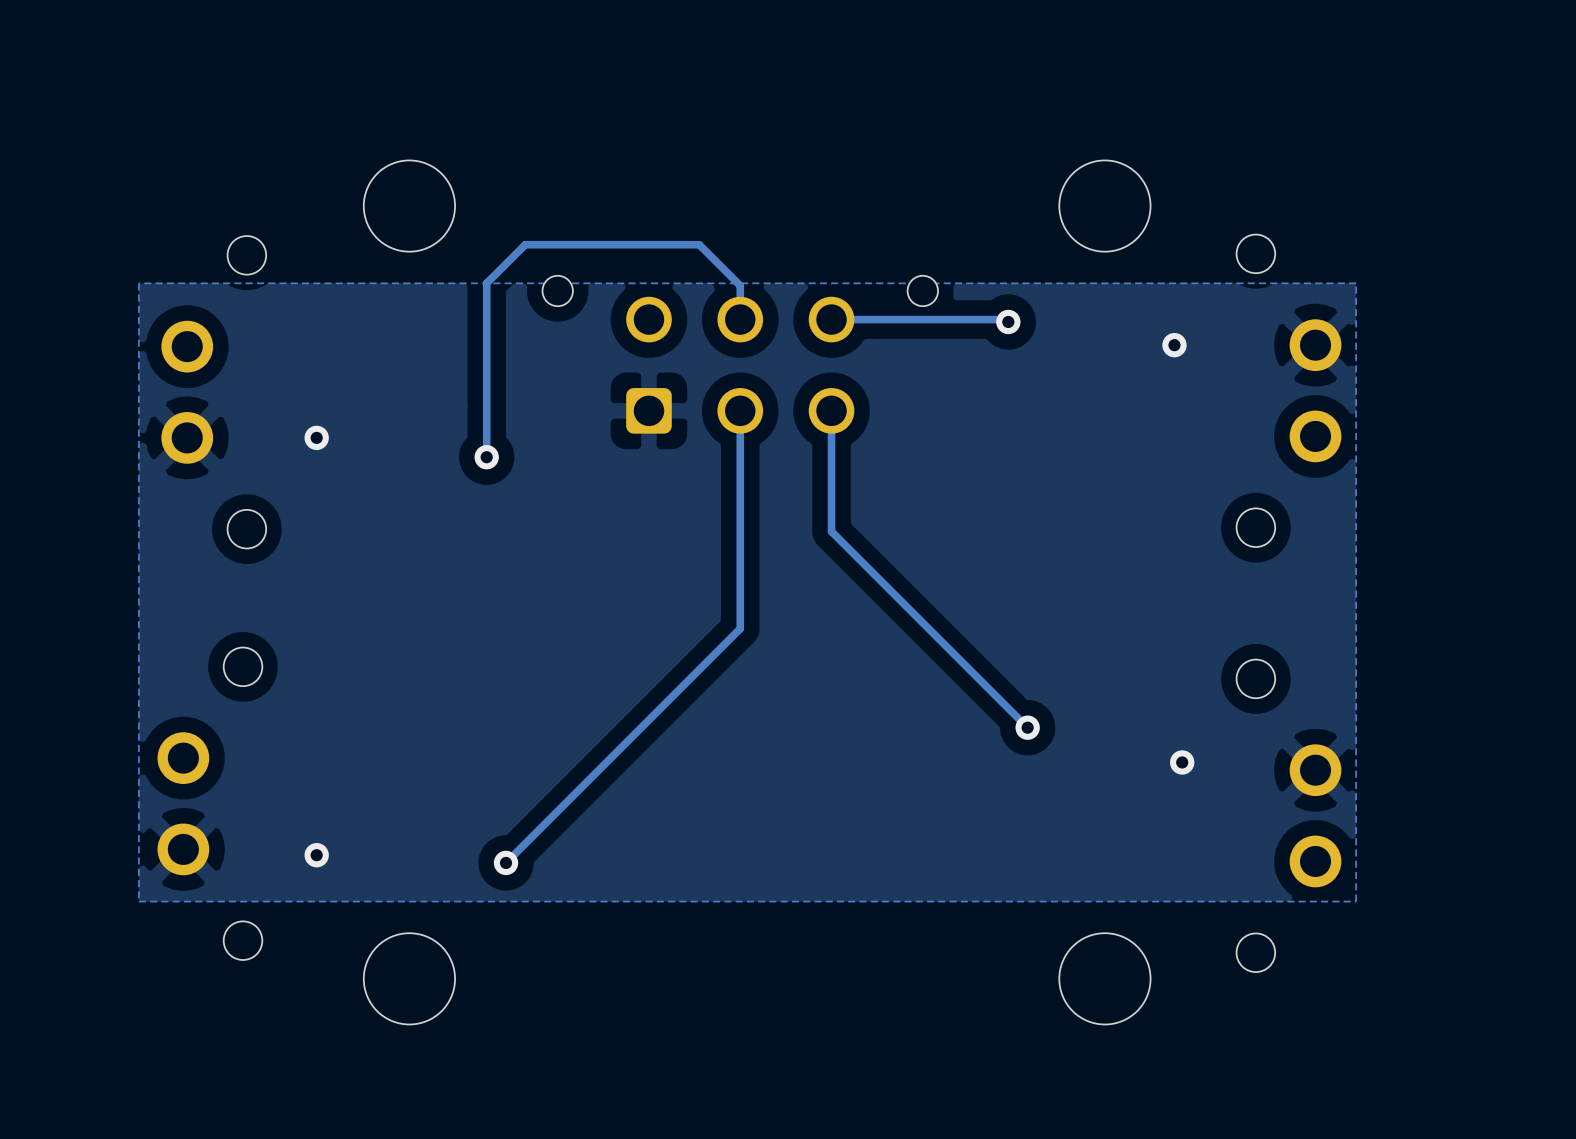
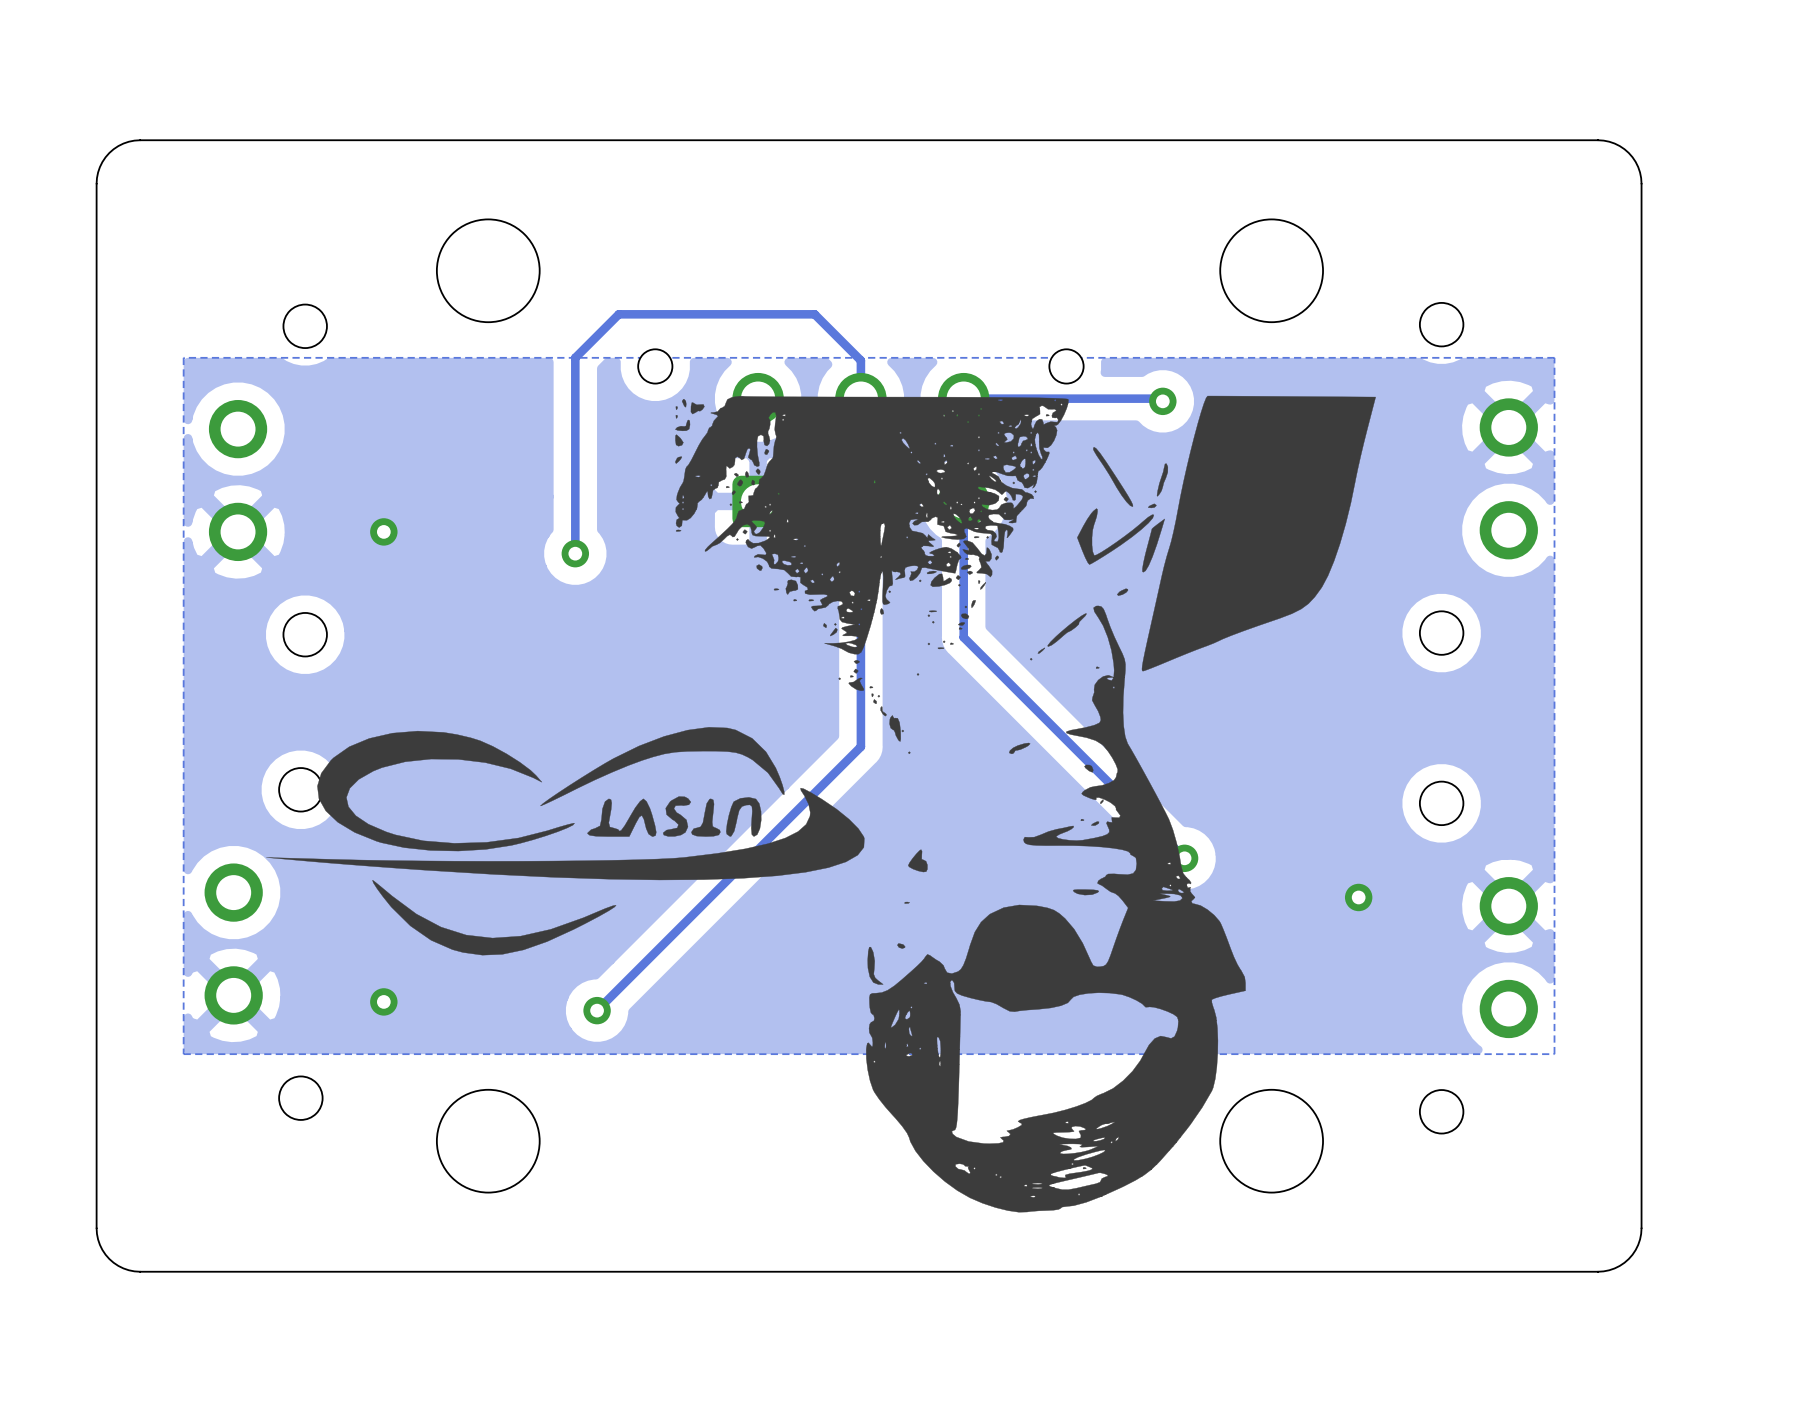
board edge: none -> (1598, 140) (140, 140) (128, 141) (113, 149) (99, 167) (96, 183) (96, 1228) (99, 1244) (105, 1254) (118, 1265) (140, 1271) (1598, 1271) (1609, 1270) (1624, 1262) (1638, 1244) (1641, 1228) (1641, 183) (1638, 167) (1628, 152) (1614, 143) (1598, 140)
drawing: none -> [266, 395, 1376, 1213]

